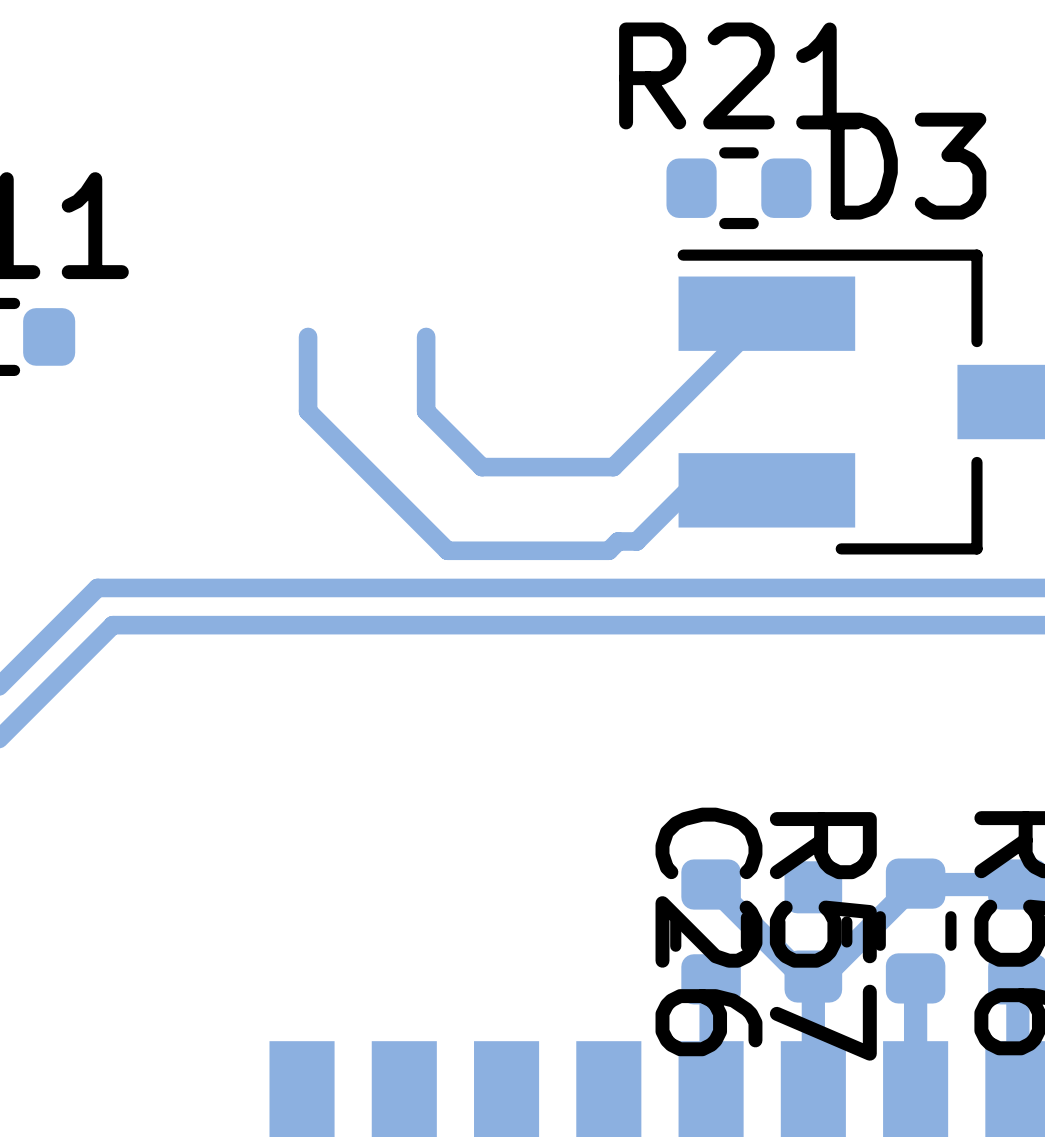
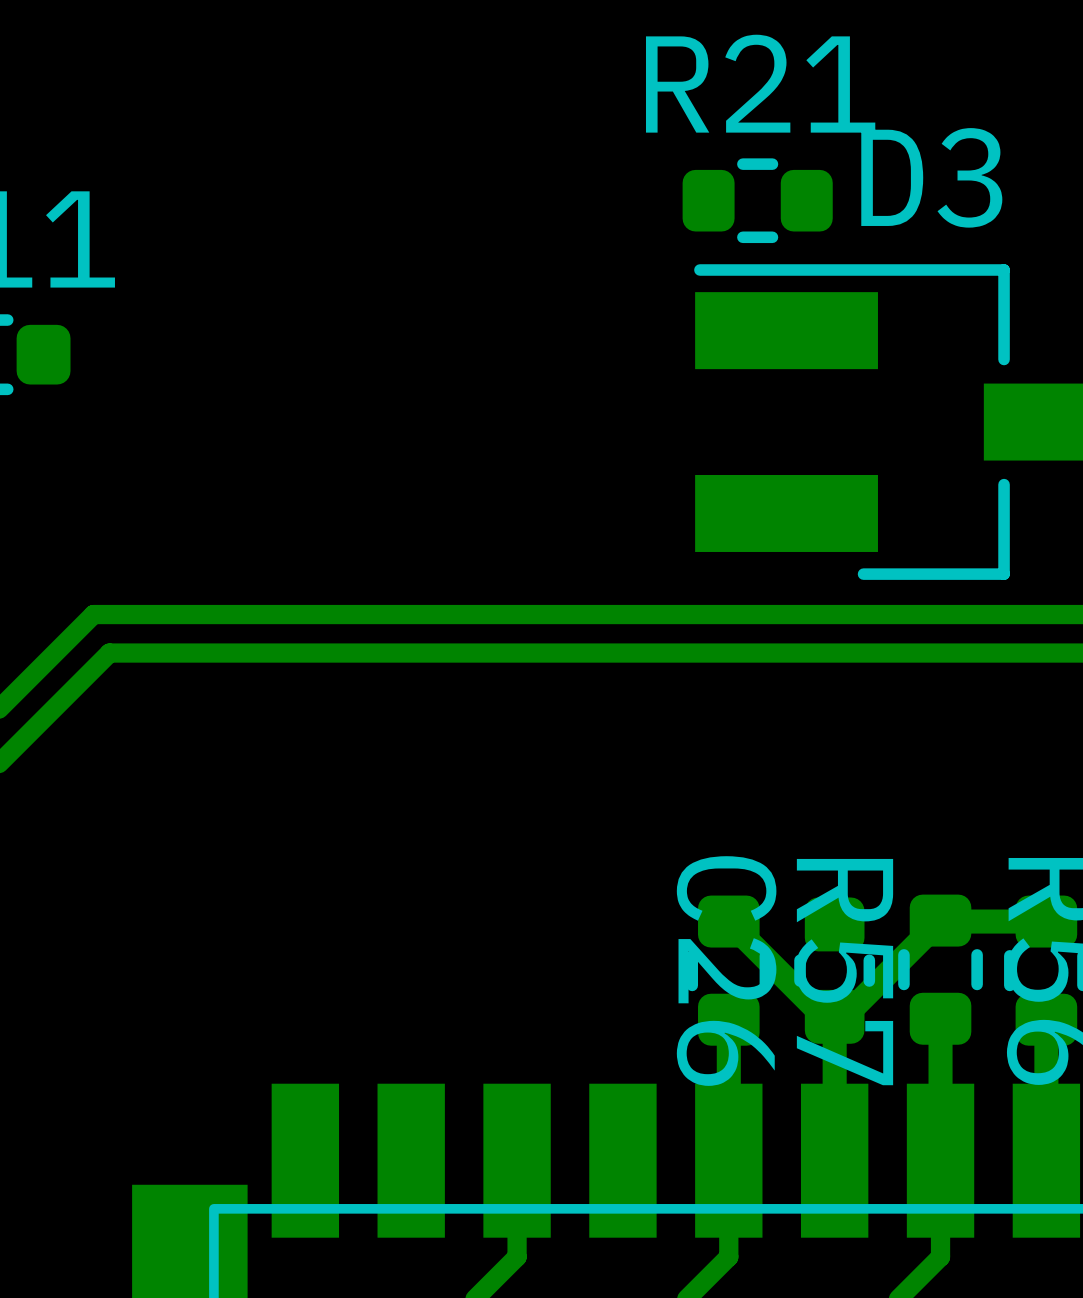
bottom track: (766, 313) (613, 467) (481, 467) (426, 411) (426, 336) -> none
bottom track: (308, 336) (308, 411) (447, 550) (608, 550) (618, 541) (636, 541) (687, 490) (766, 490) -> none

